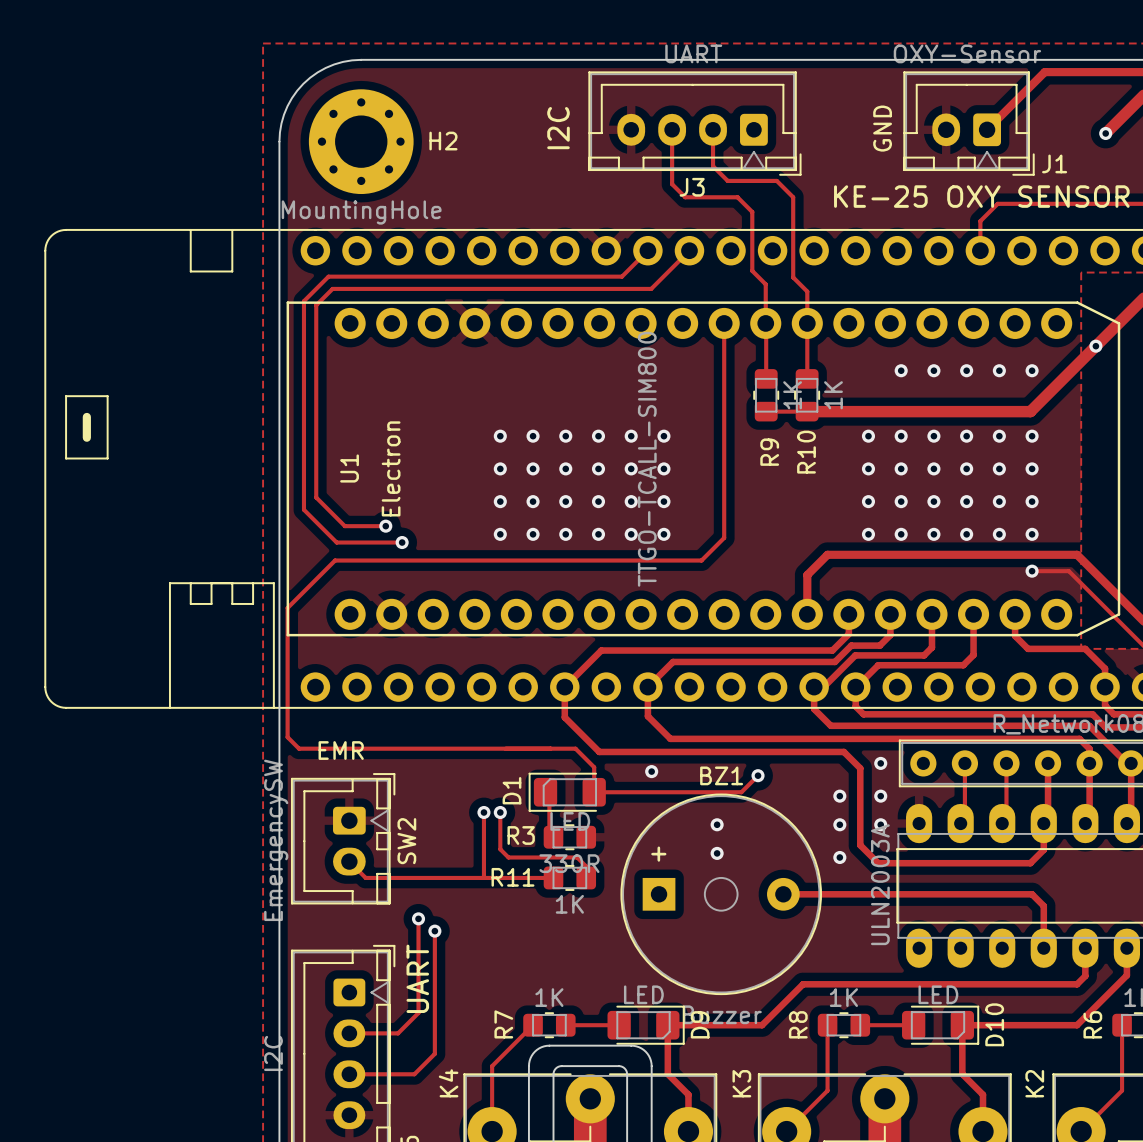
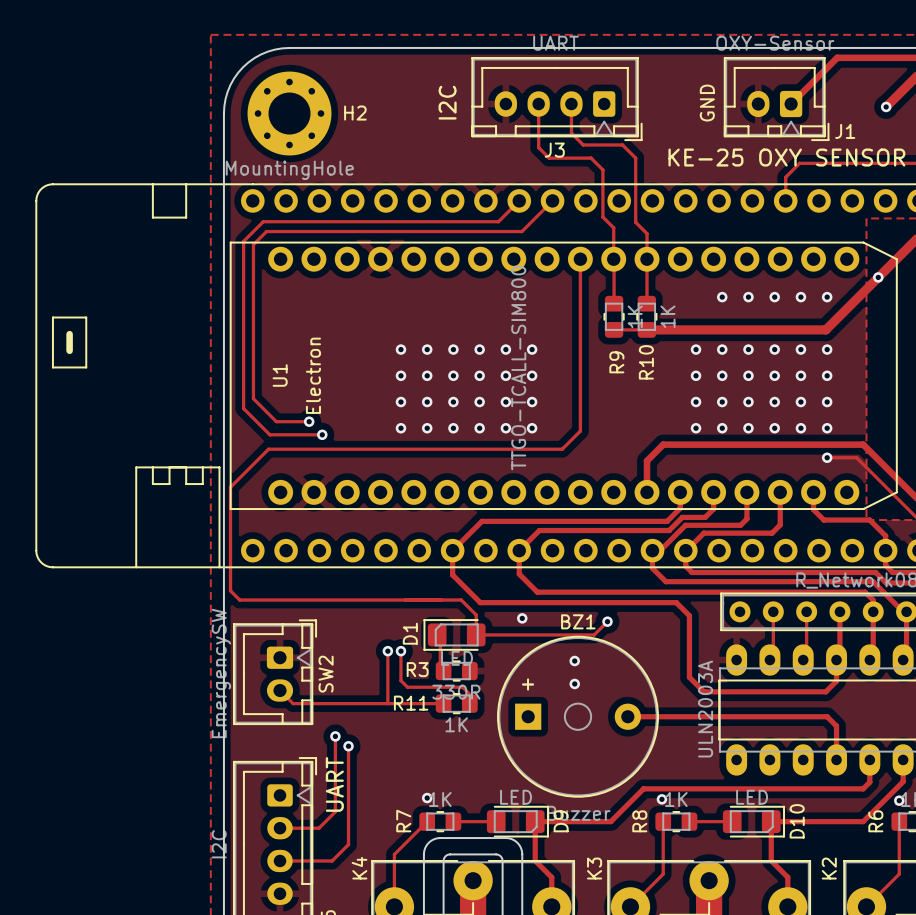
text: EMR (341, 750) -> none
via: (880, 763) -> none
via: (839, 796) -> none
via: (880, 796) -> none
via: (839, 824) -> none
via: (880, 824) -> none
via: (839, 857) -> none
via: none -> (427, 798)
via: none -> (661, 799)
via: none -> (899, 800)

